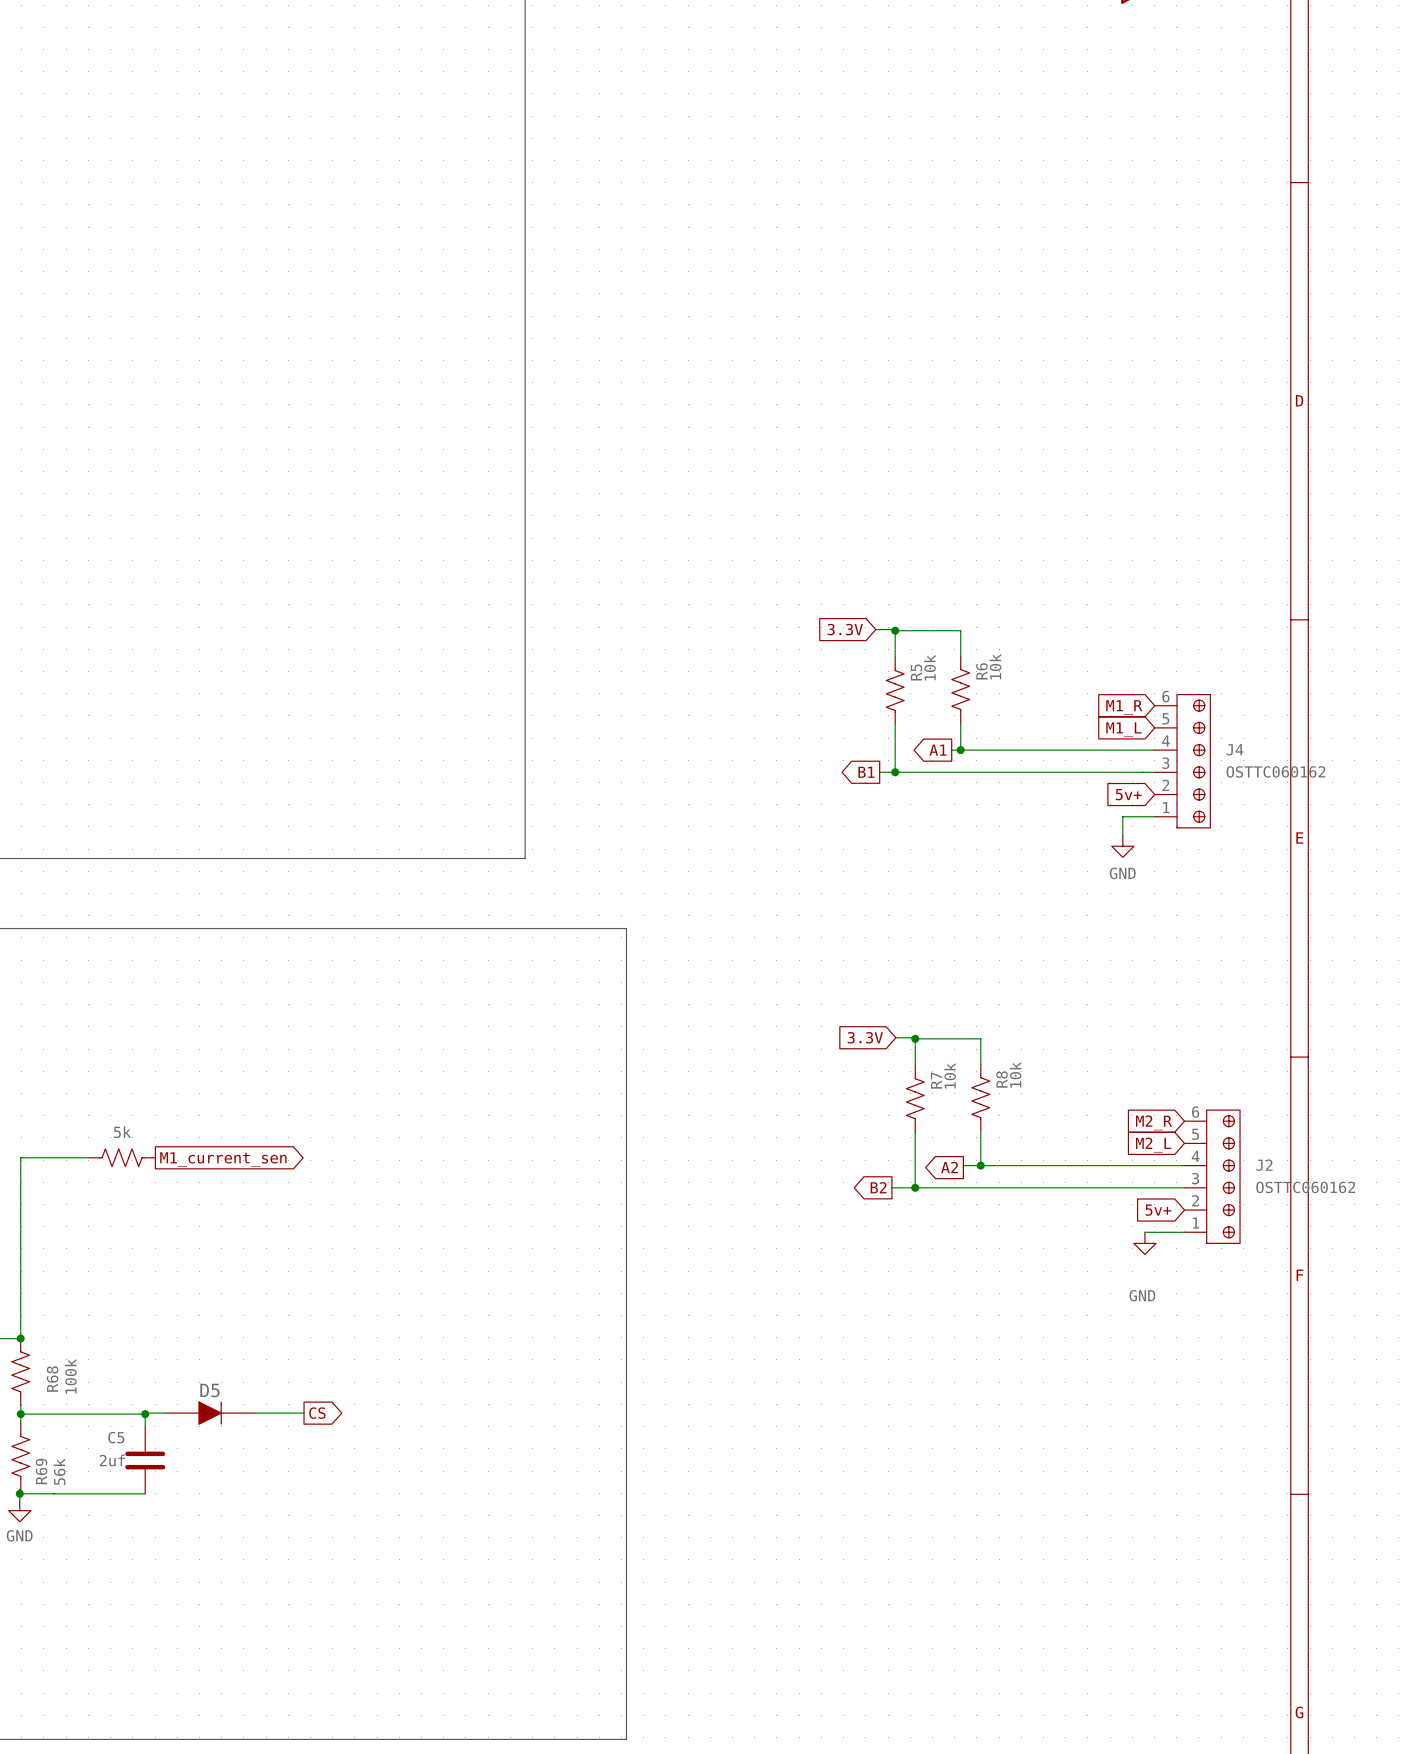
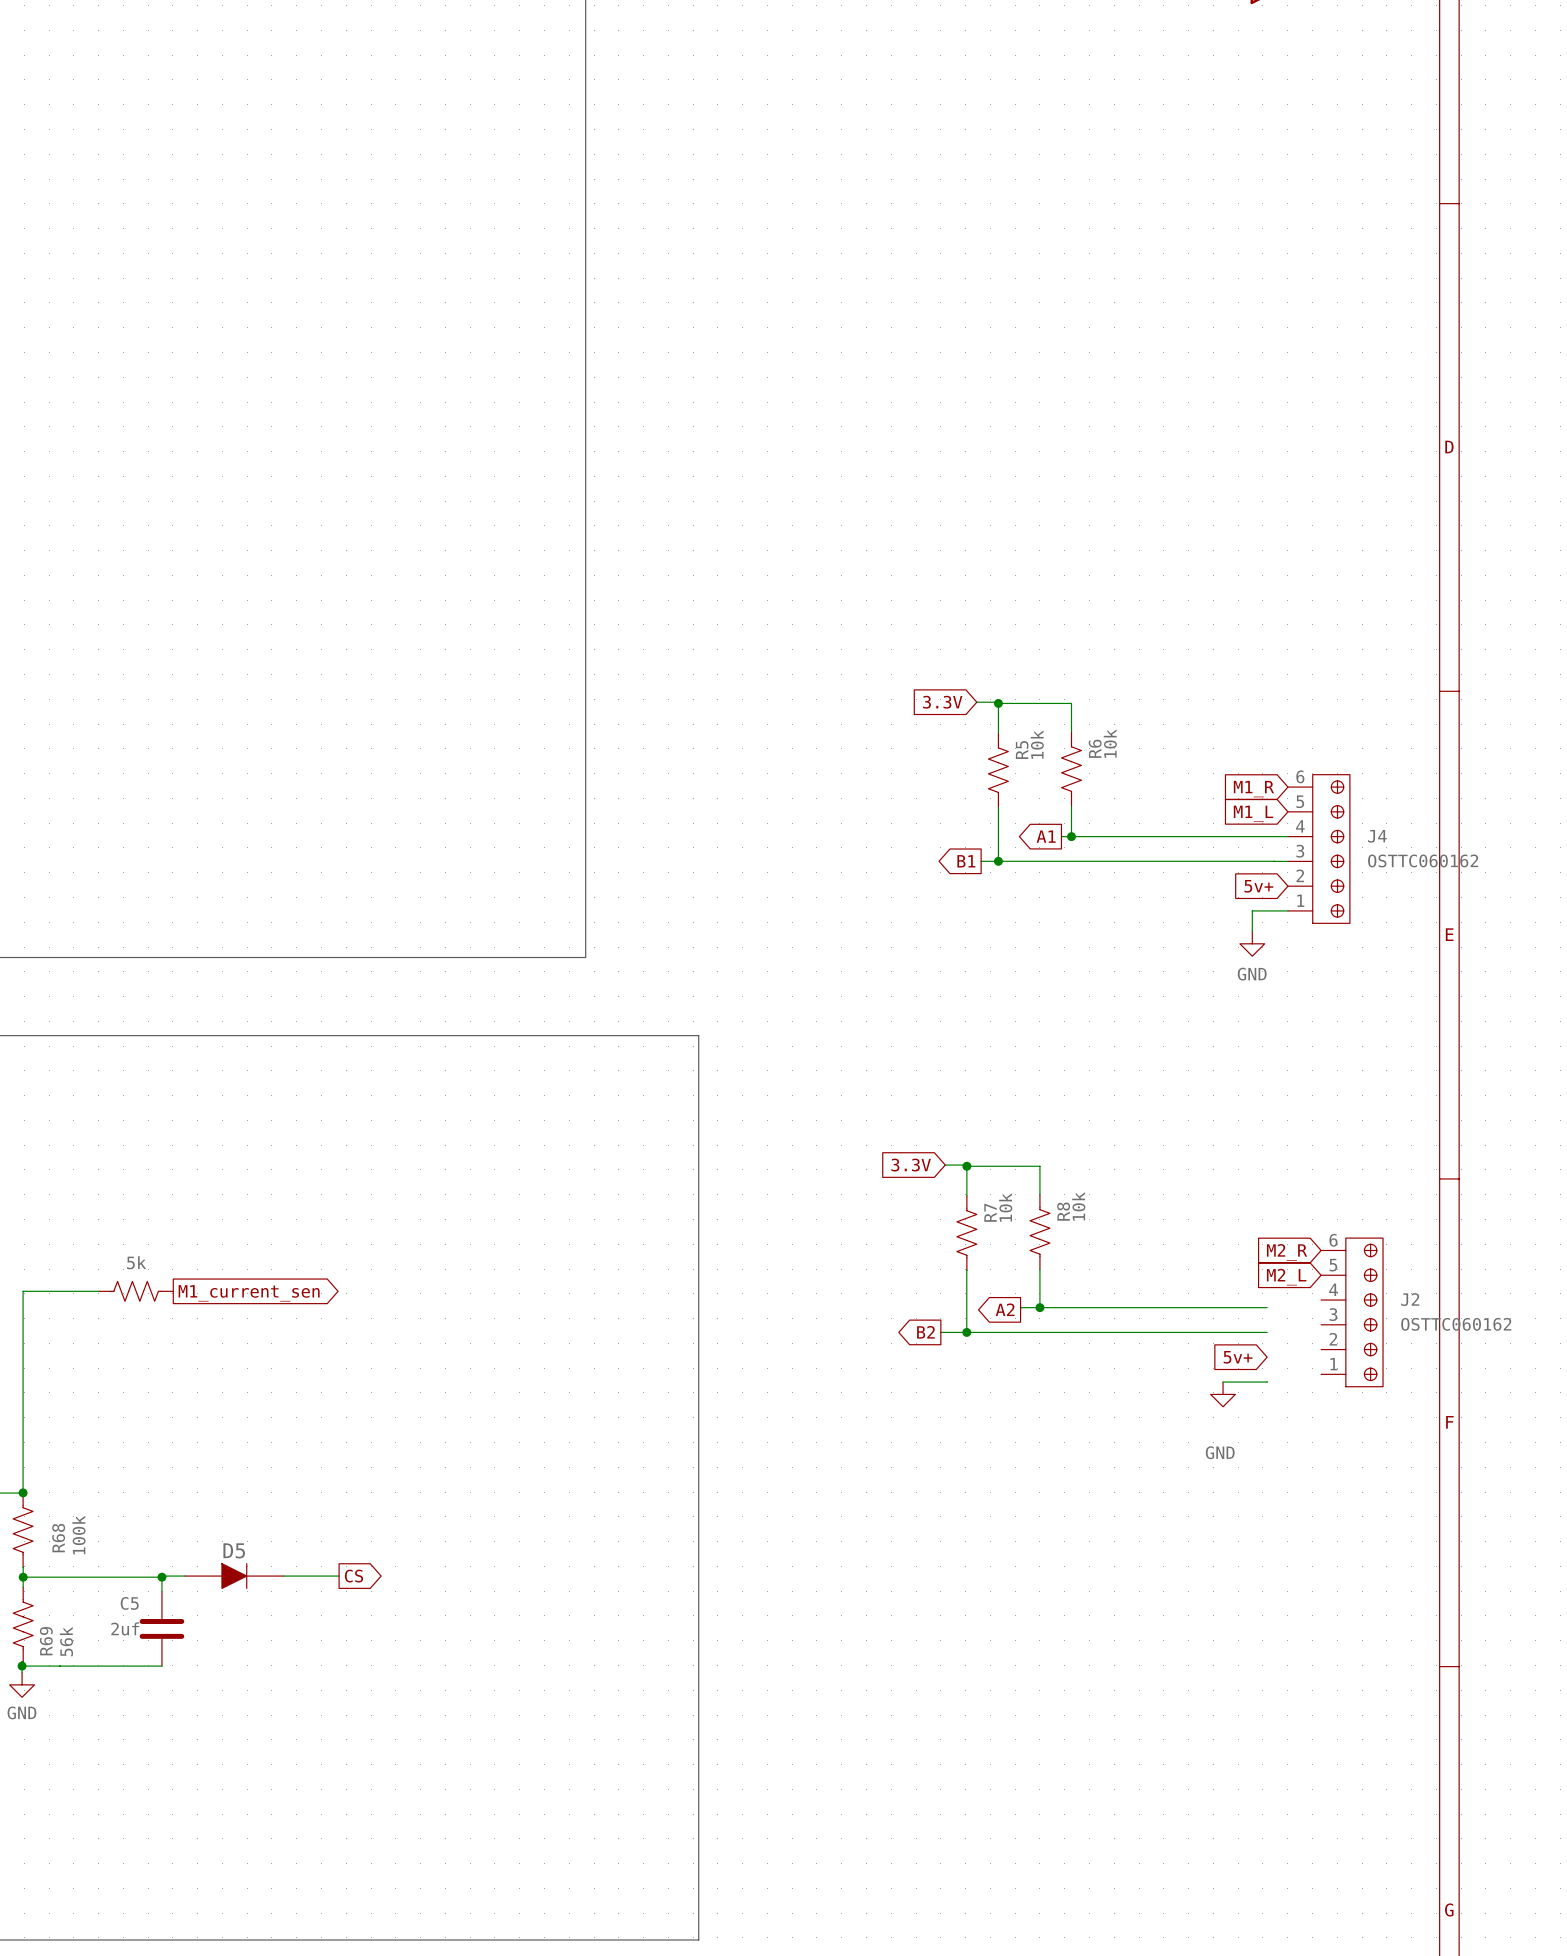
global label position: 3.3V (865, 1037) -> 3.3V (911, 1165)
wire: (895, 1037) (915, 1037) (915, 1065) -> (945, 1165) (966, 1165) (966, 1195)
wire: (915, 1038) (980, 1038) (980, 1064) -> (966, 1166) (1039, 1166) (1039, 1194)
junction position: (915, 1038) -> (966, 1166)
R8 position: (980, 1097) -> (1039, 1231)
R7 position: (915, 1098) -> (966, 1233)
wire: (980, 1131) (980, 1165) -> (1039, 1269) (1039, 1307)
wire: (915, 1132) (915, 1187) -> (966, 1270) (966, 1332)
junction: (980, 1165) -> none
wire: (1184, 1165) (963, 1165) (963, 1167) -> (1267, 1307) (1020, 1307) (1020, 1309)
global label position: A2 (949, 1167) -> A2 (1005, 1309)
global label position: B2 (878, 1187) -> B2 (925, 1332)
wire: (891, 1187) (1184, 1187) -> (940, 1332) (1267, 1332)
junction position: (915, 1187) -> (1039, 1307)
junction: none -> (966, 1332)
global label position: 5v+ (1158, 1210) -> 5v+ (1238, 1357)
wire: (1144, 1232) (1184, 1232) -> (1223, 1382) (1267, 1382)
power symbol position: GND (1144, 1243) -> GND (1223, 1394)

